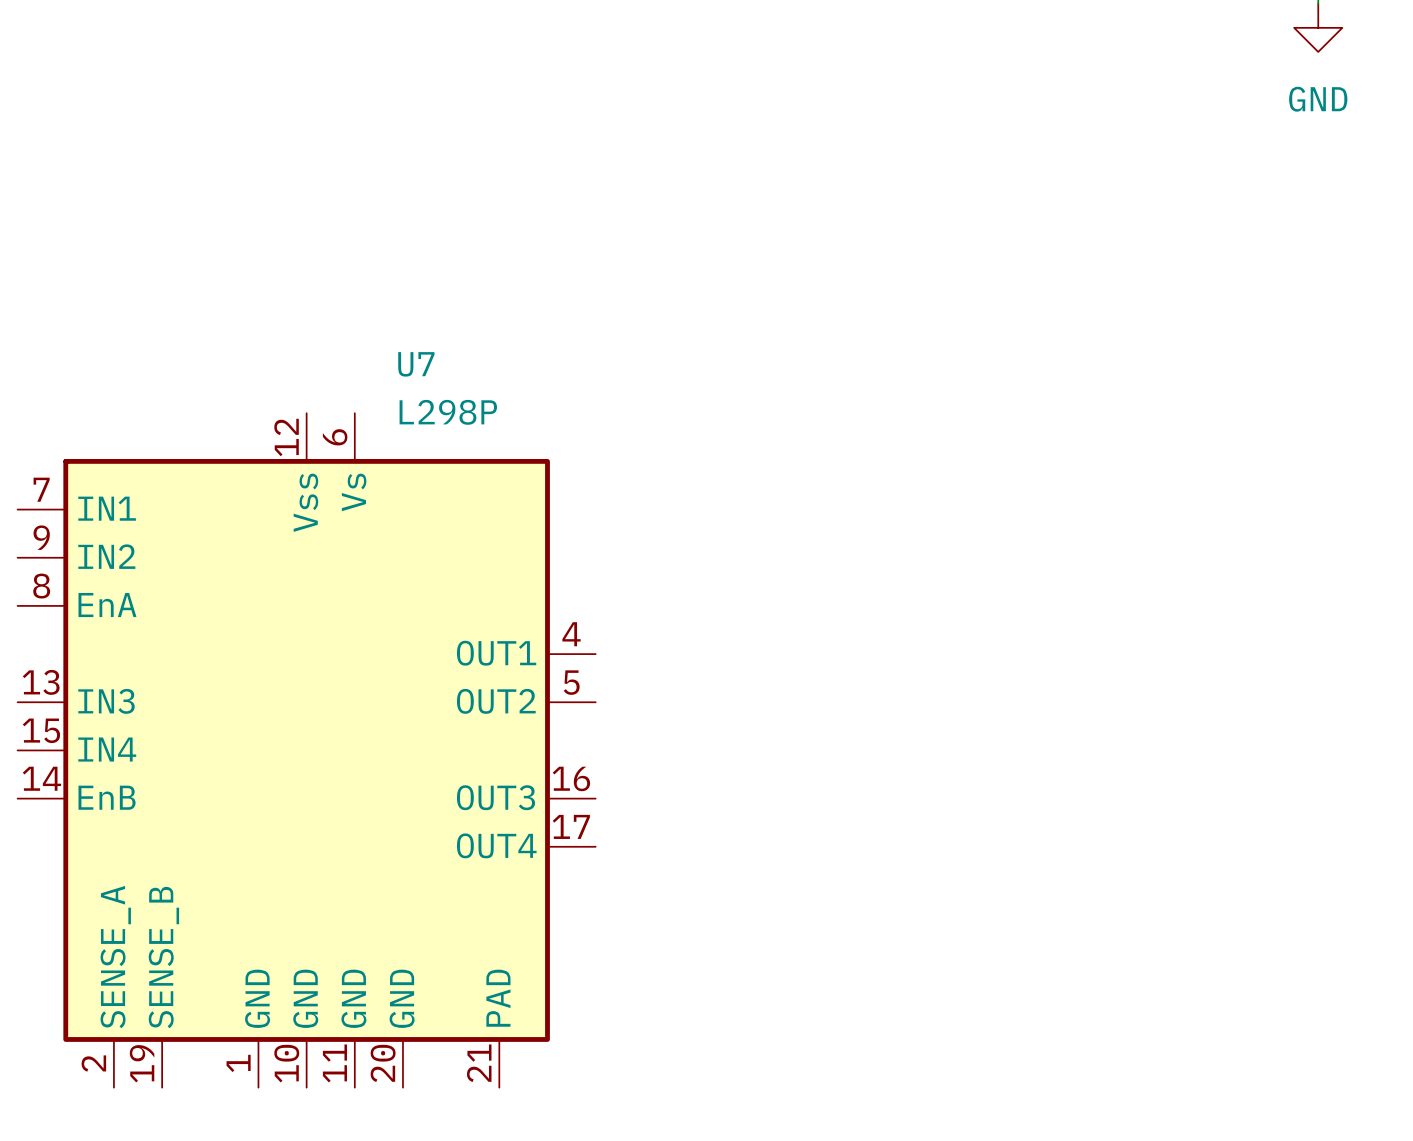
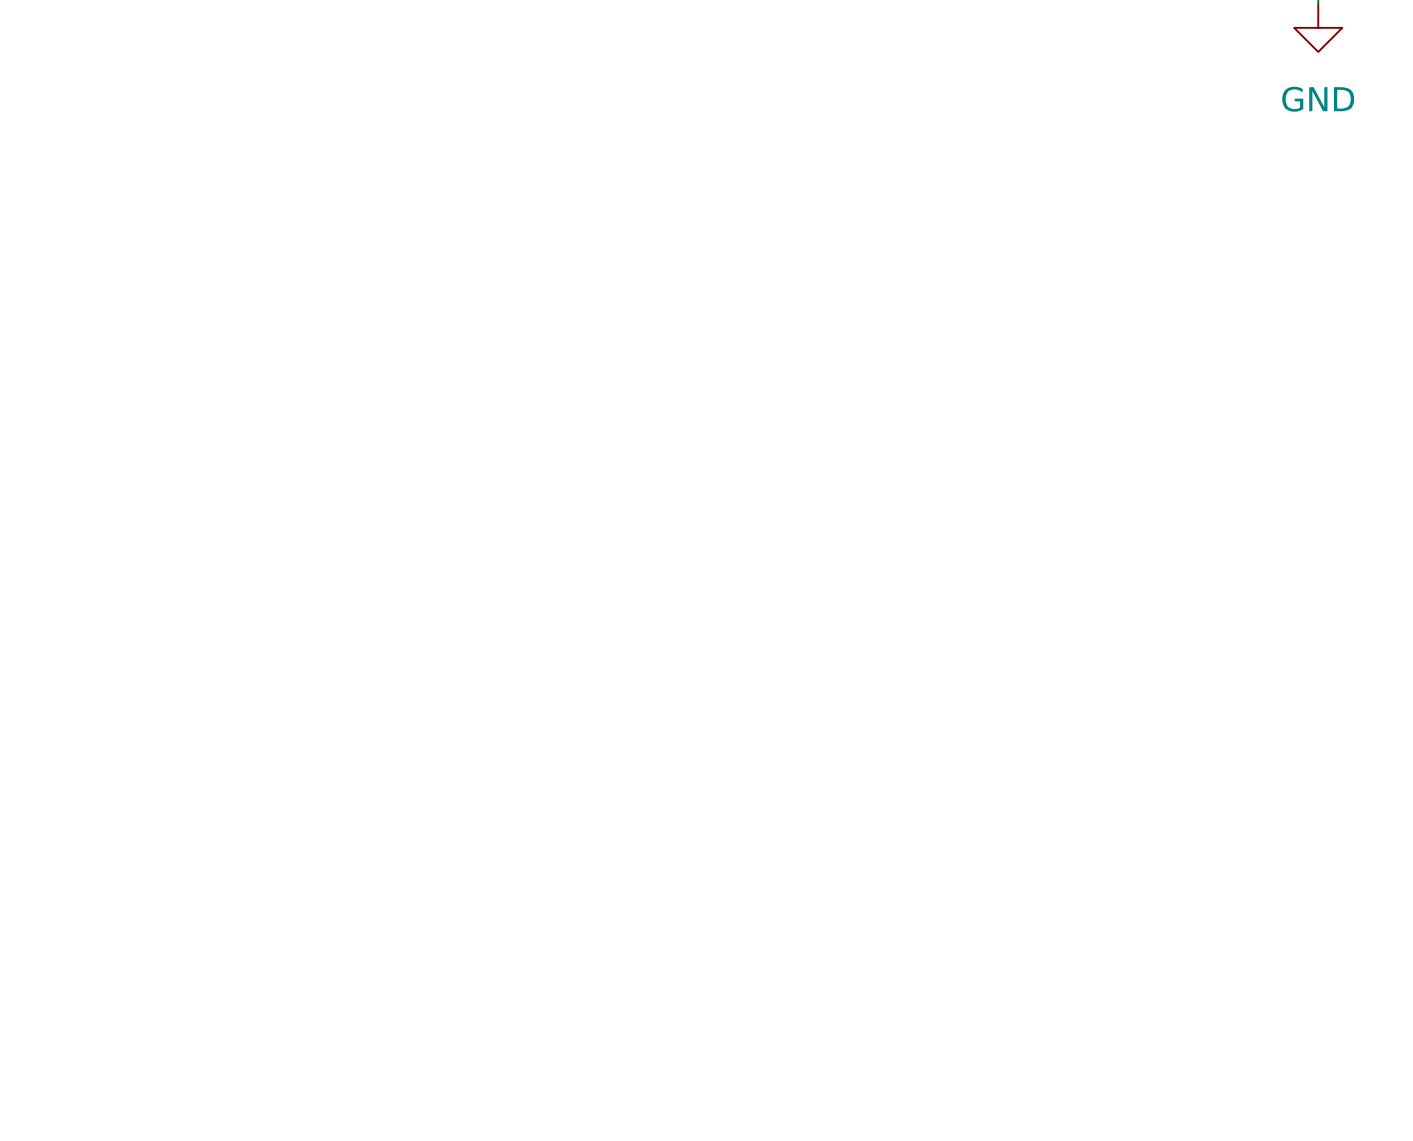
U7: L298P (306, 750) -> none

